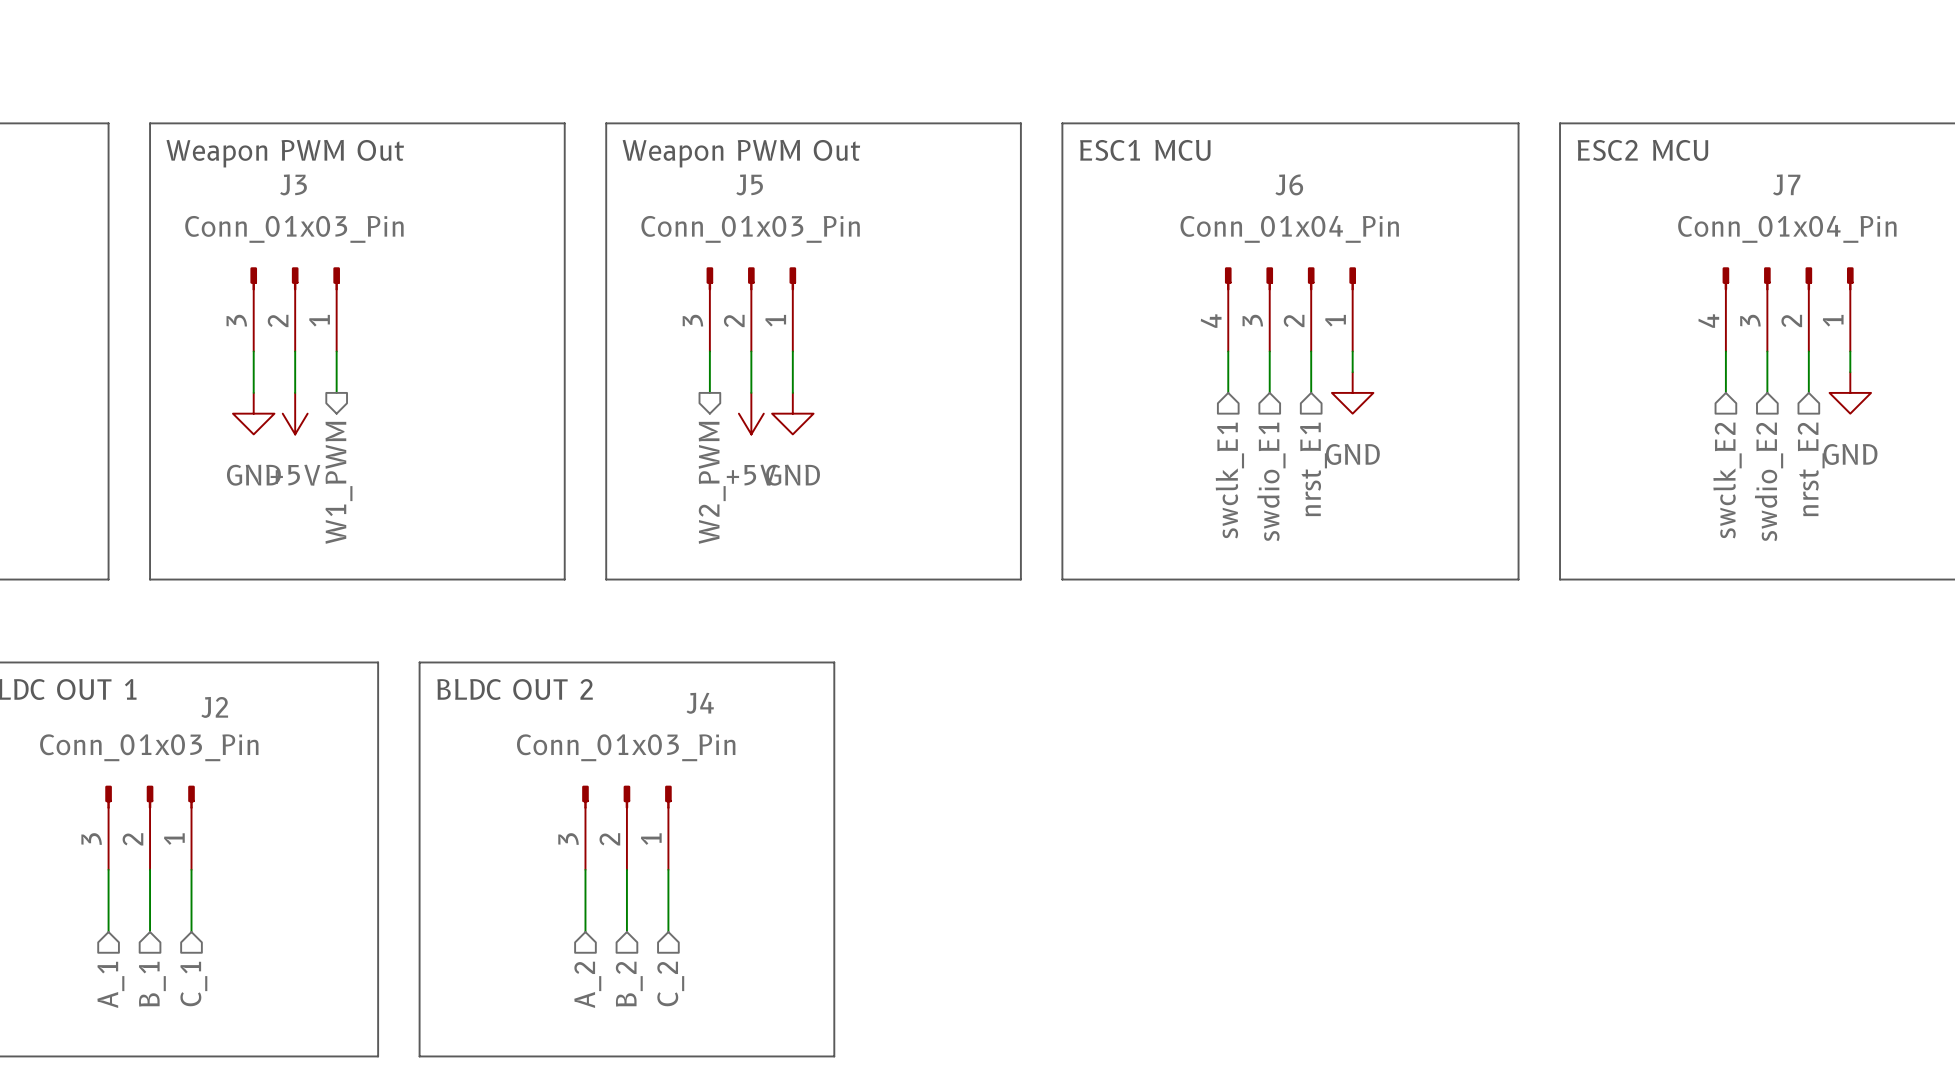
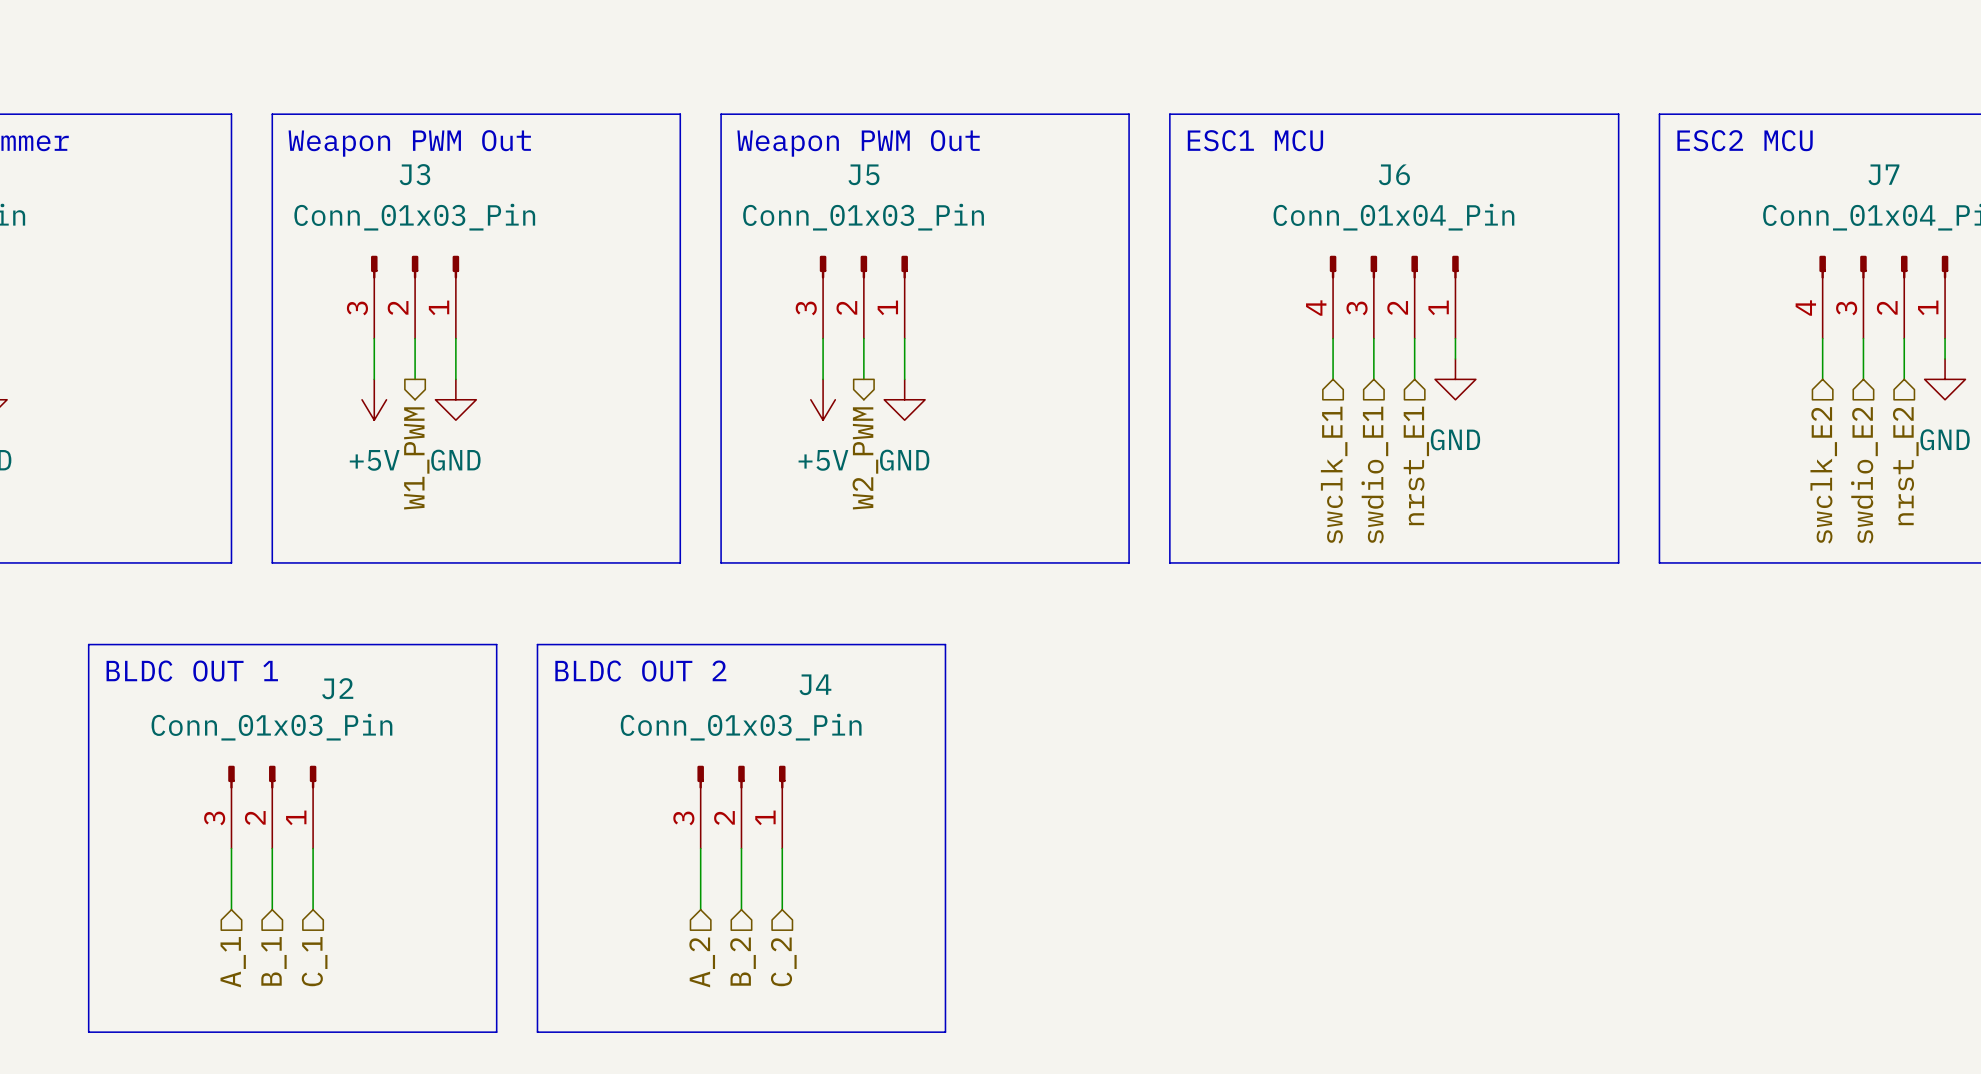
power symbol: GND (253, 413) -> +5V (374, 399)
power symbol: +5V (295, 413) -> none
power symbol: none -> GND (455, 399)
power symbol position: +5V (751, 413) -> +5V (823, 399)
hierarchical label position: W1_PWM (338, 482) -> W1_PWM (416, 458)
hierarchical label position: W2_PWM (712, 482) -> W2_PWM (865, 458)

